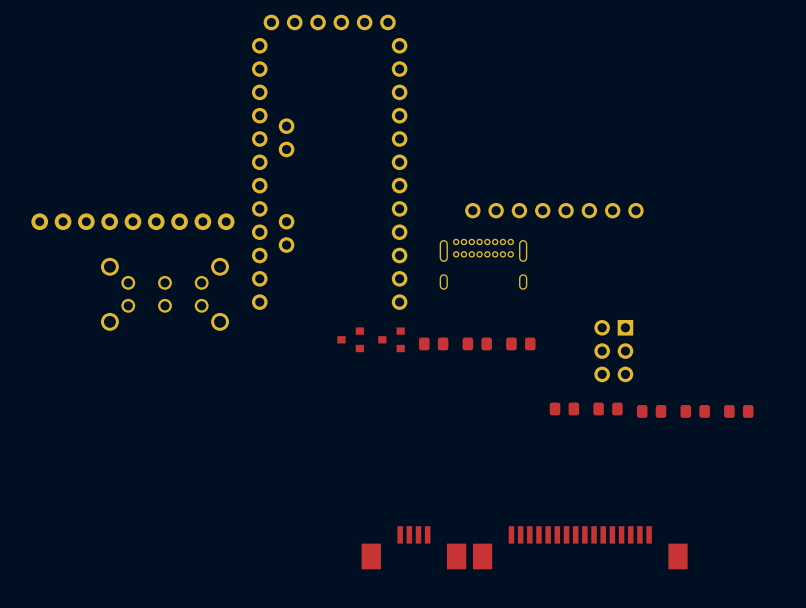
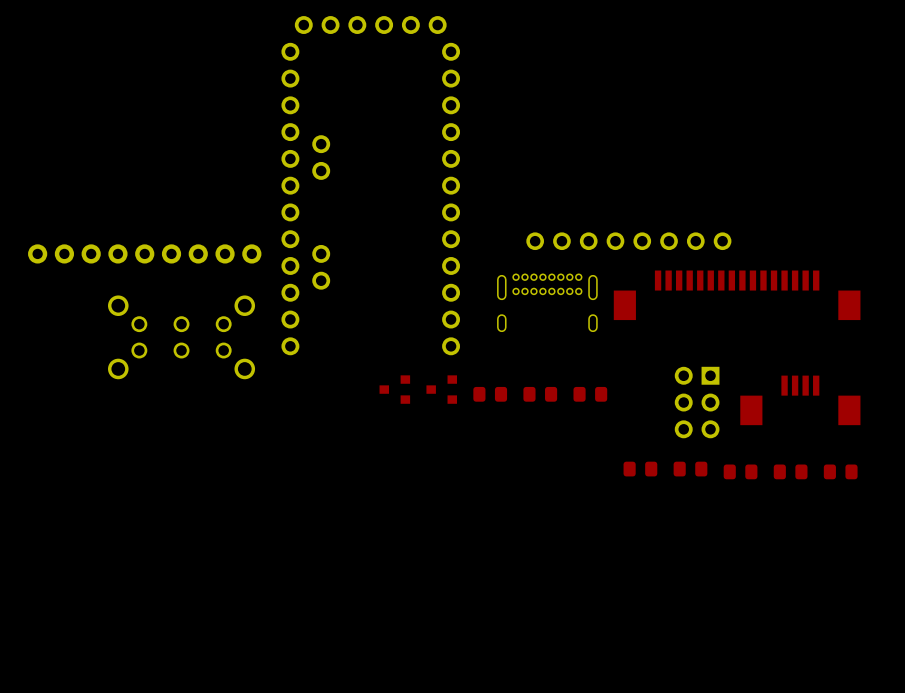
part: none -> (737, 295)
part: none -> (800, 400)
part: (524, 547) -> none

